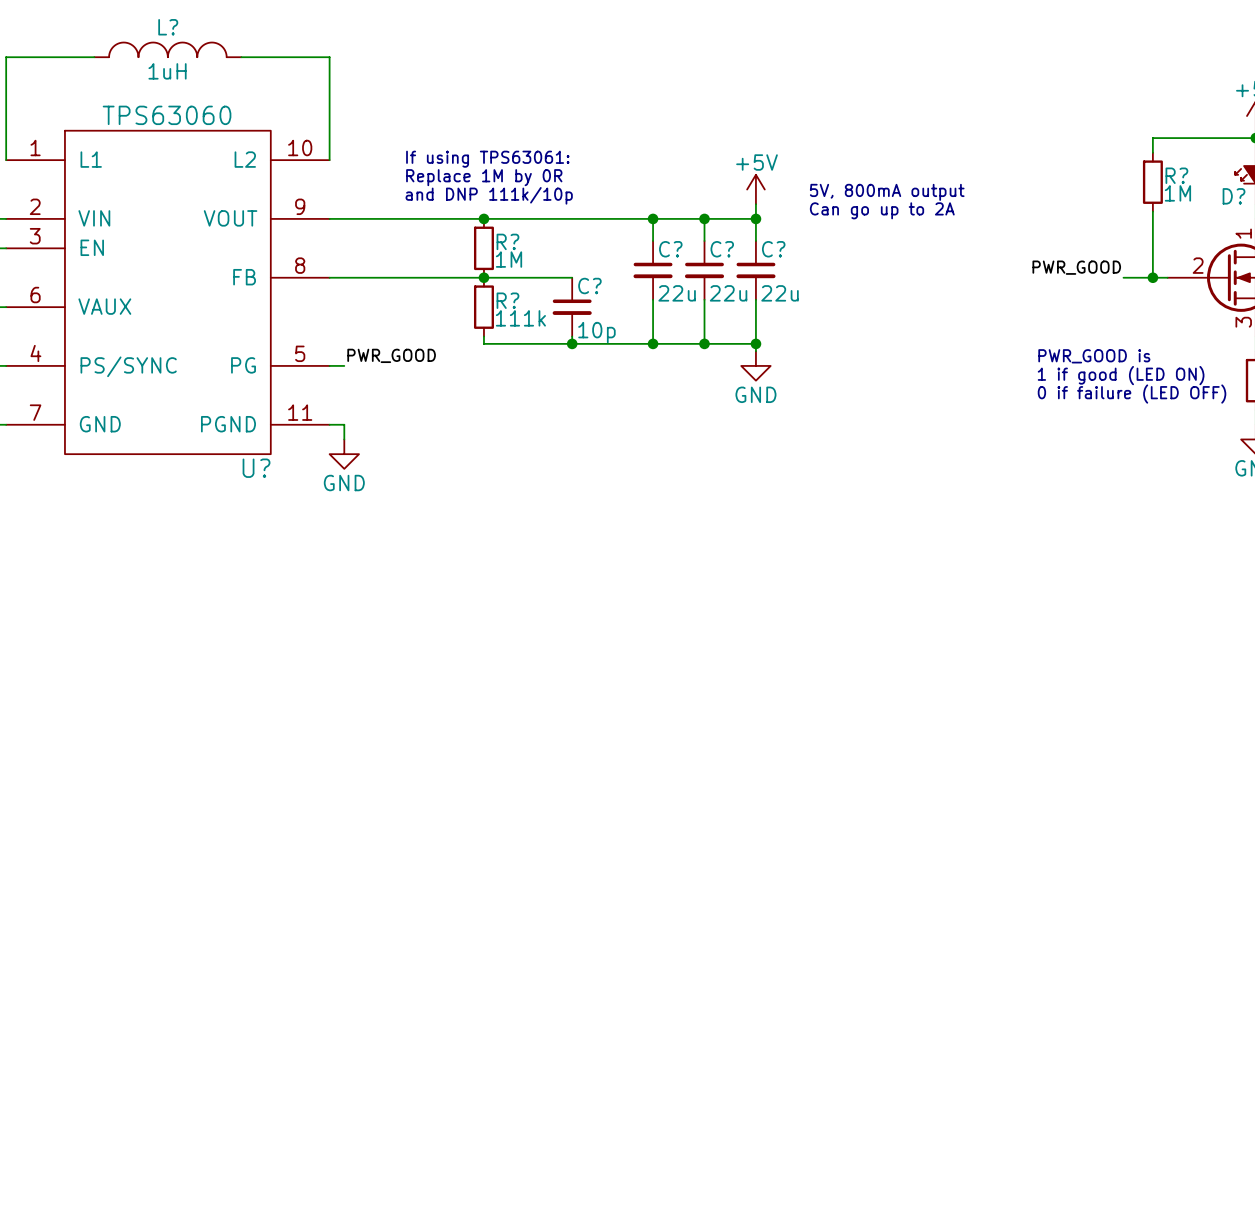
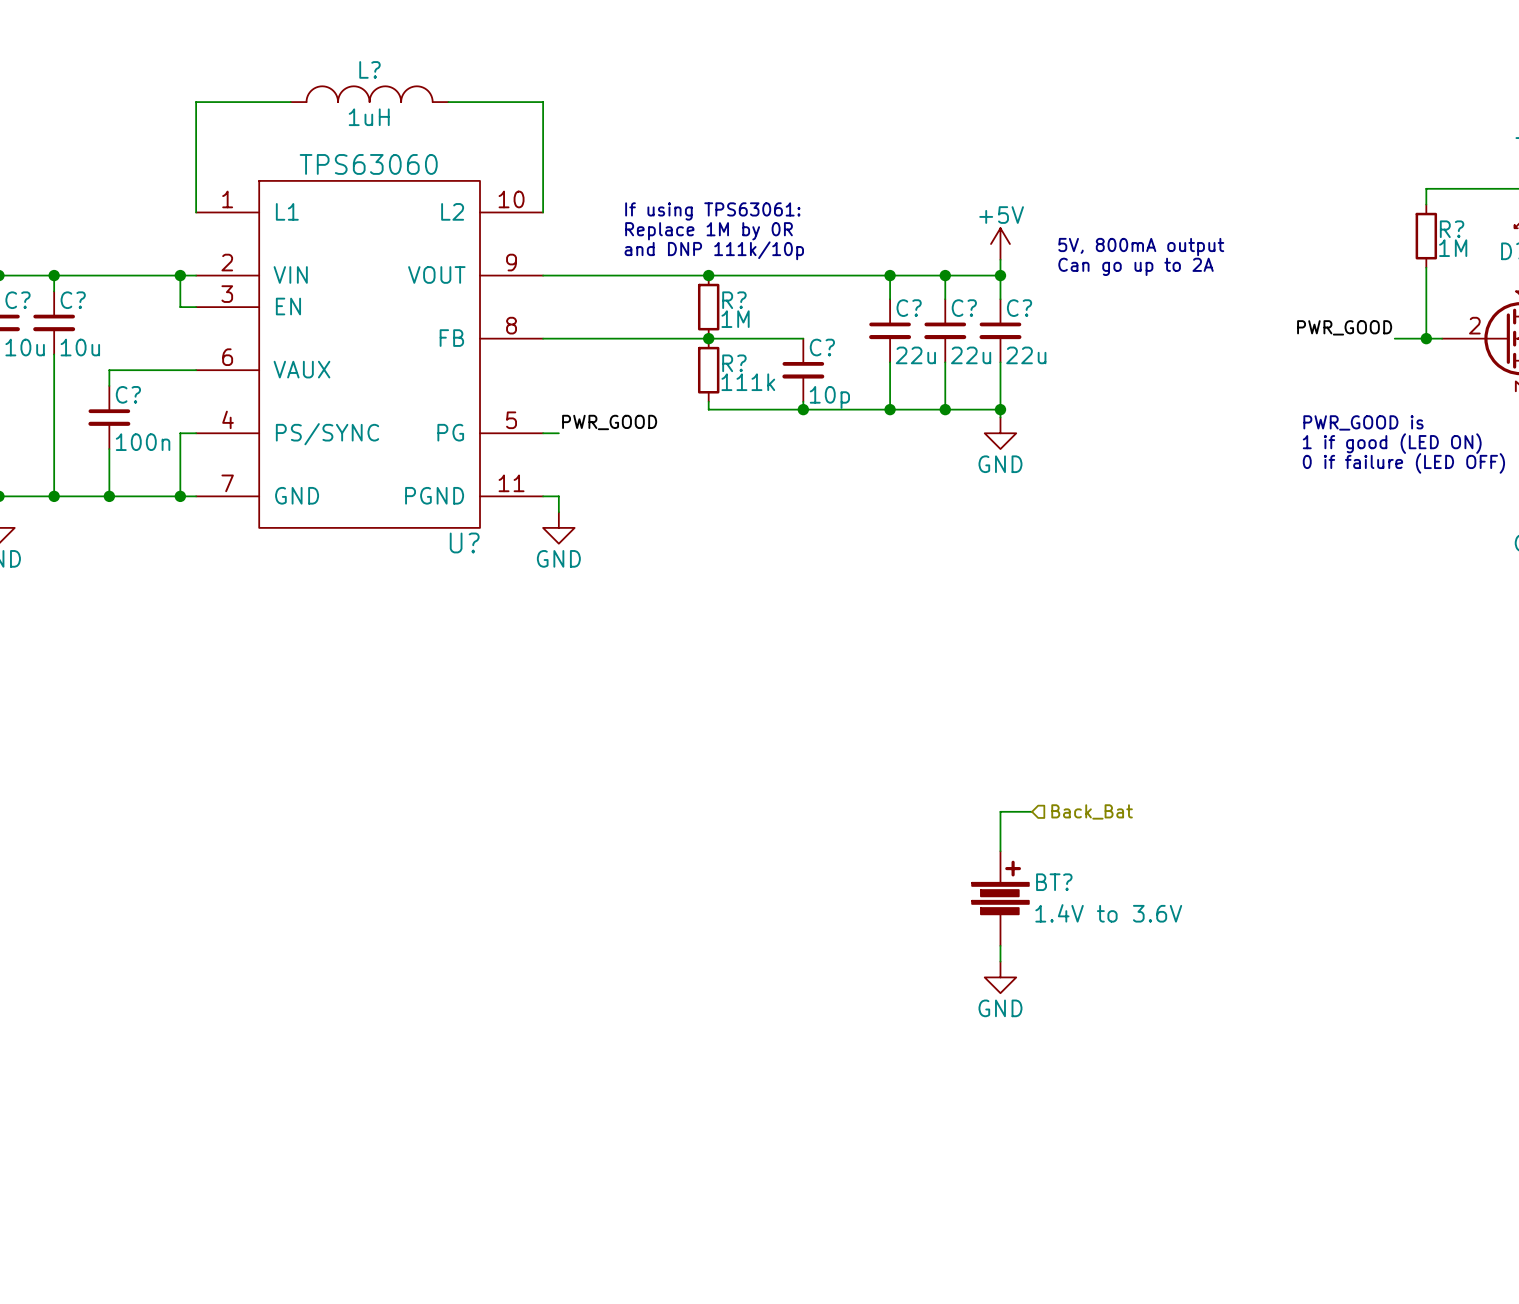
wire: none -> (1032, 811) (1000, 811) (1000, 851)
hierarchical label: none -> Back_Bat (1092, 811)
BT?: none -> 1.4V to 3.6V (1000, 898)
wire: none -> (1000, 945) (1000, 961)
power symbol: none -> GND (1000, 977)

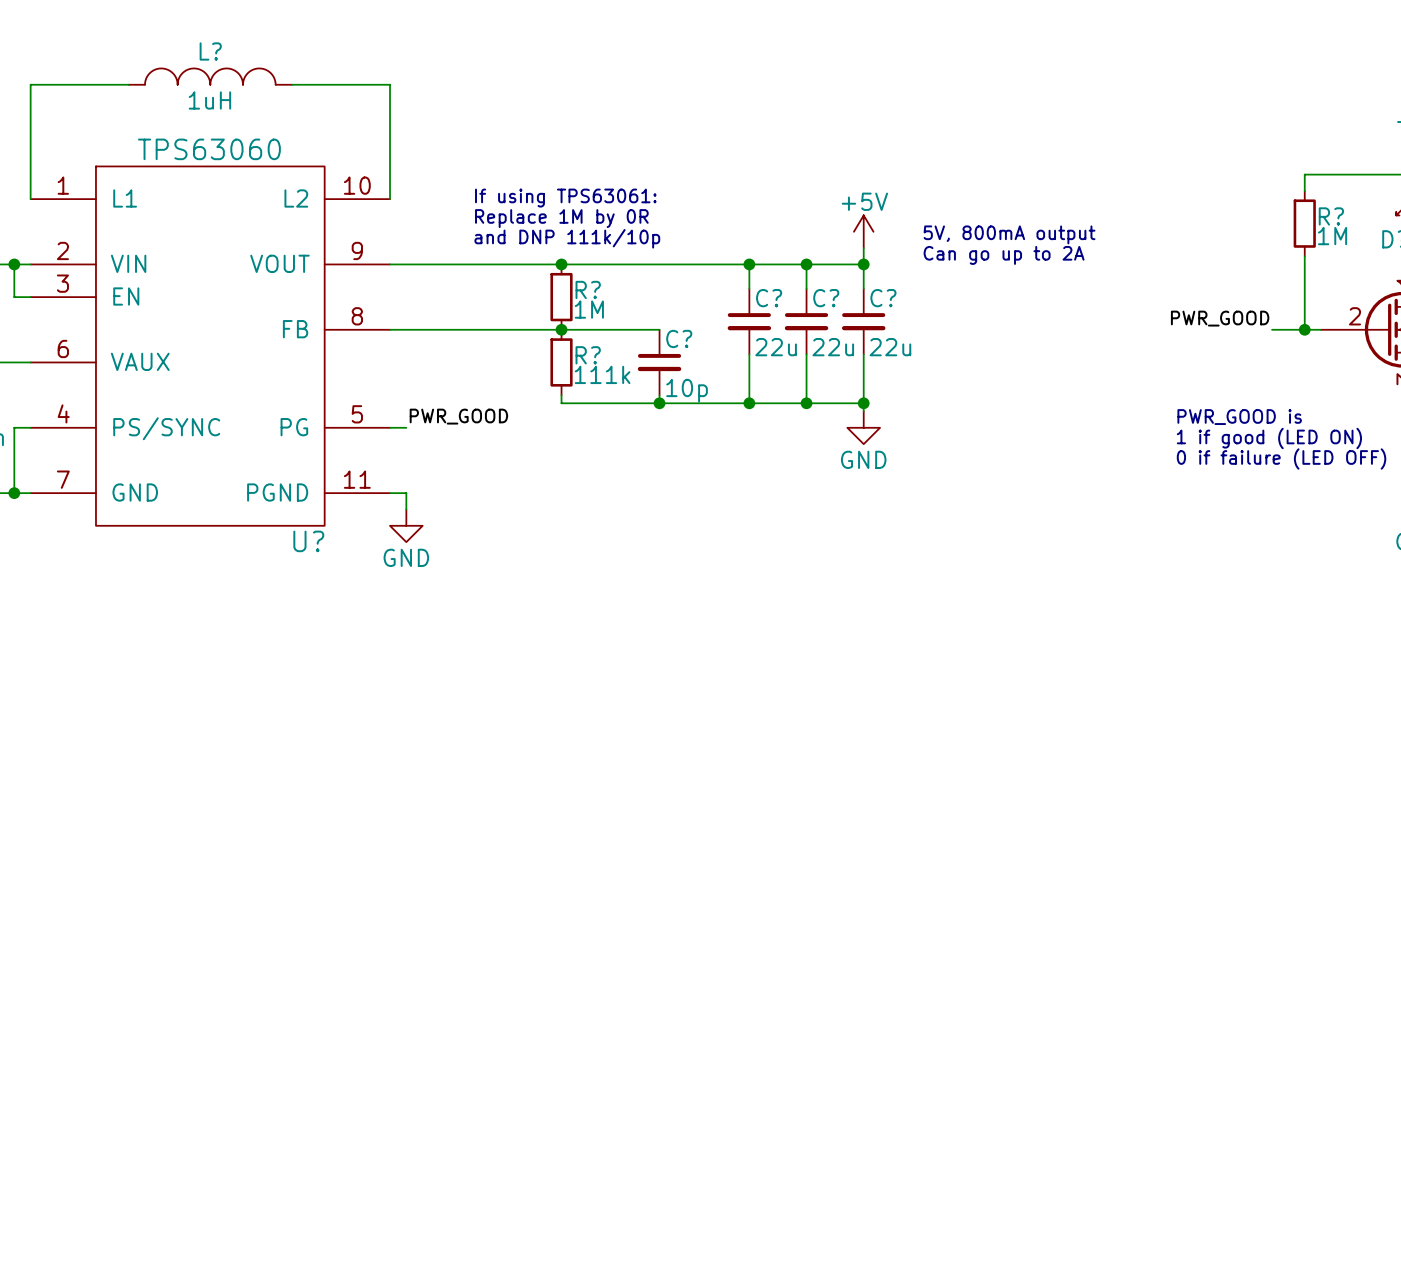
wire: (1032, 811) (1000, 811) (1000, 851) -> none
hierarchical label: Back_Bat (1092, 811) -> none
BT?: 1.4V to 3.6V (1000, 898) -> none
wire: (1000, 945) (1000, 961) -> none
power symbol: GND (1000, 977) -> none

